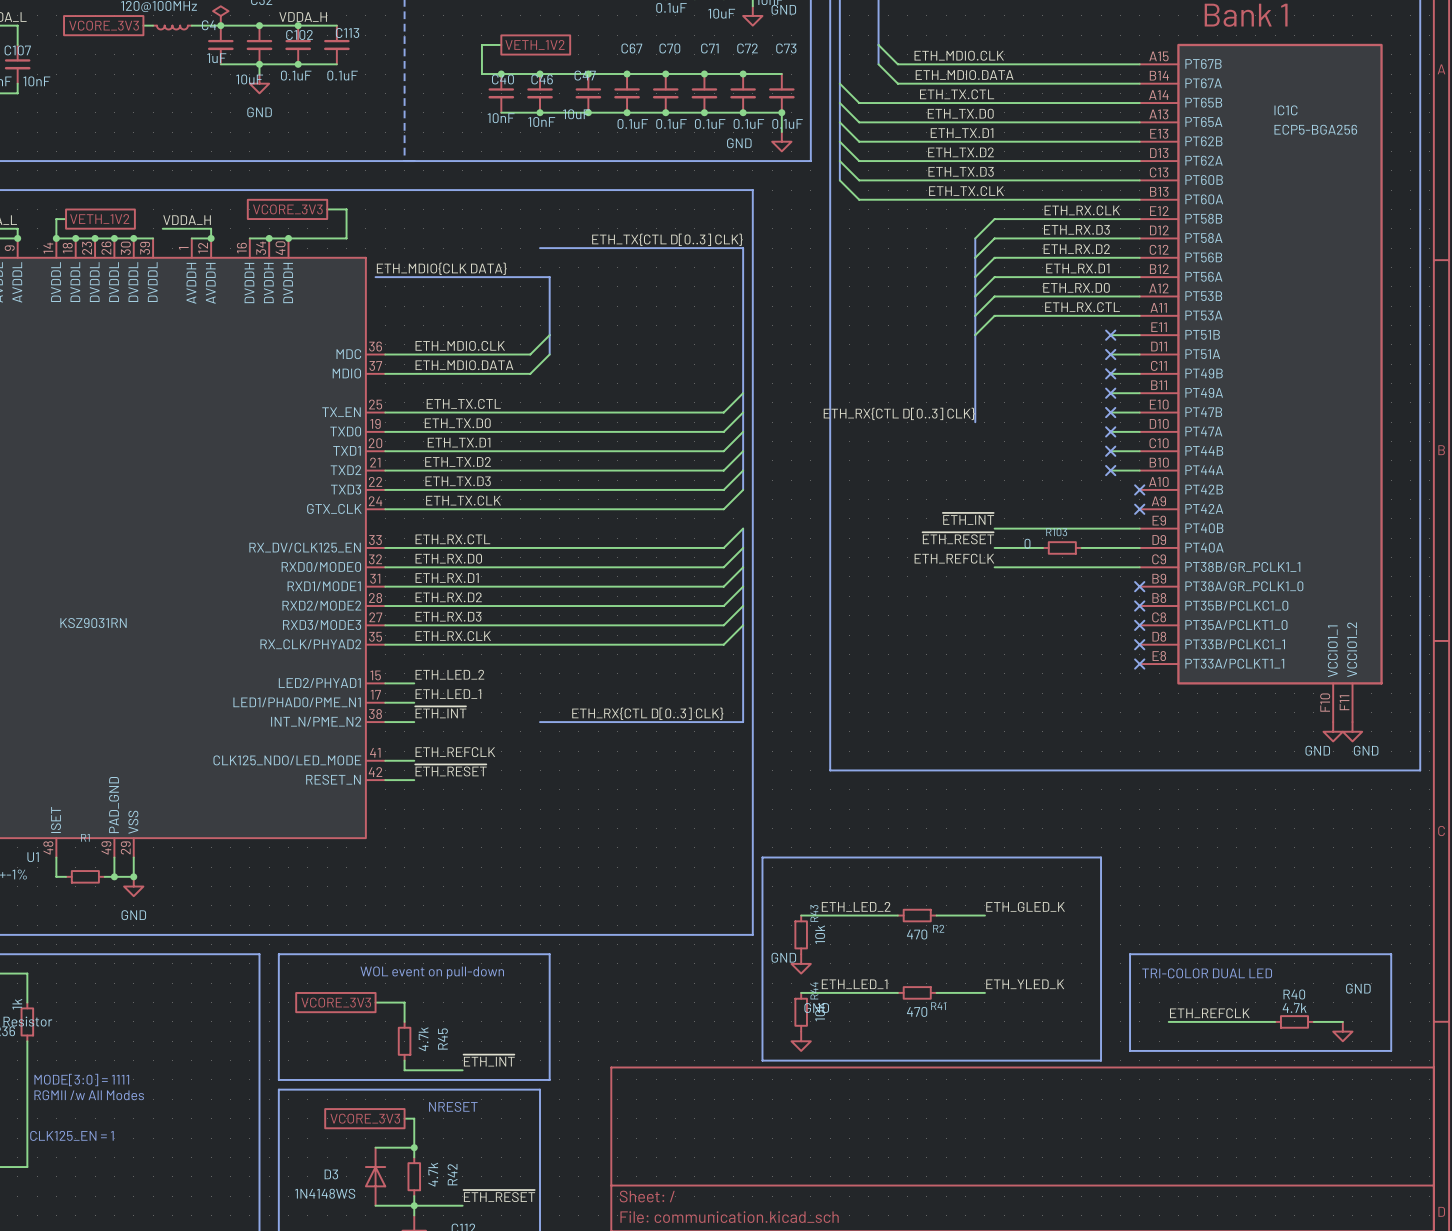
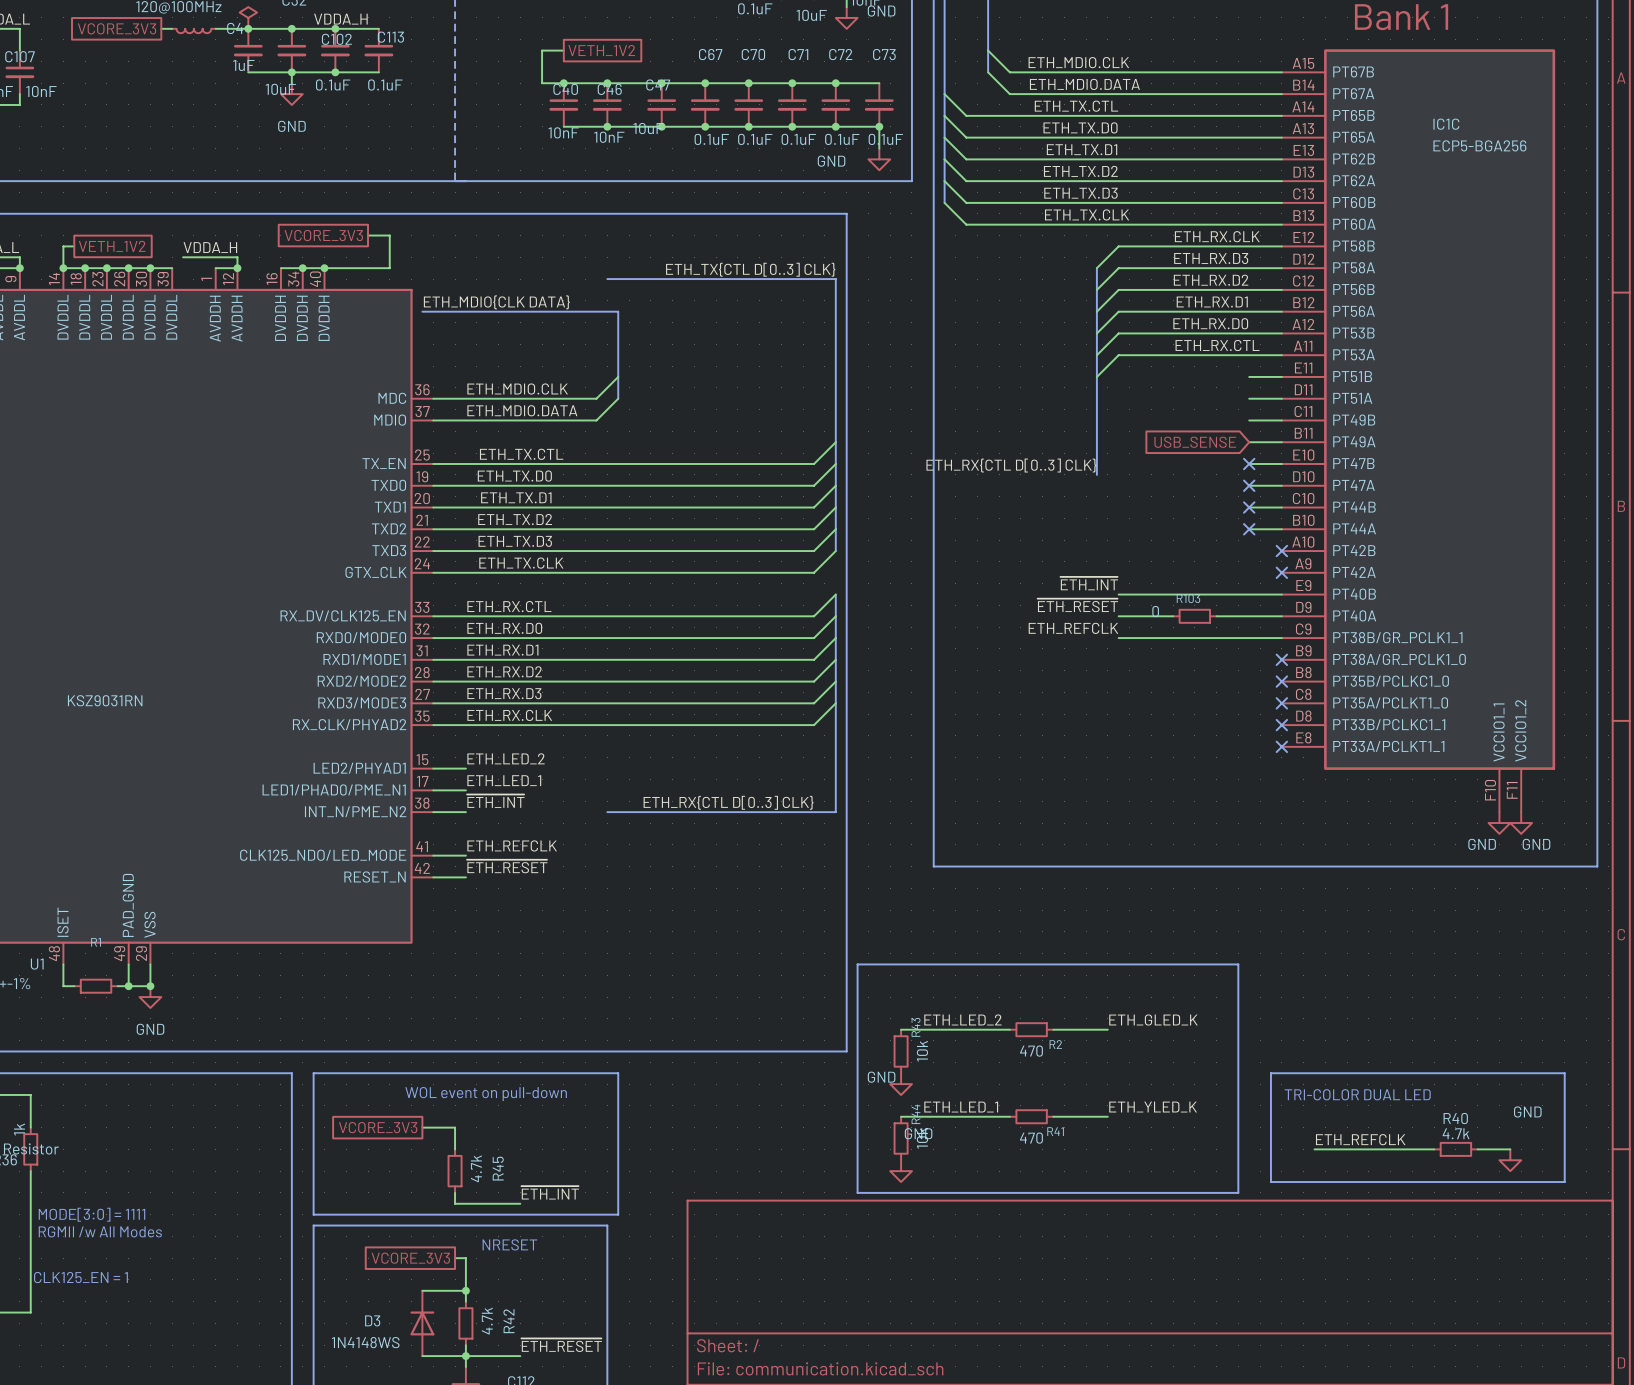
no-connect mark: (1110, 335) -> none
no-connect mark: (1110, 354) -> none
no-connect mark: (1110, 373) -> none
global label: none -> USB_SENSE (1195, 442)
no-connect mark: (1110, 393) -> none

